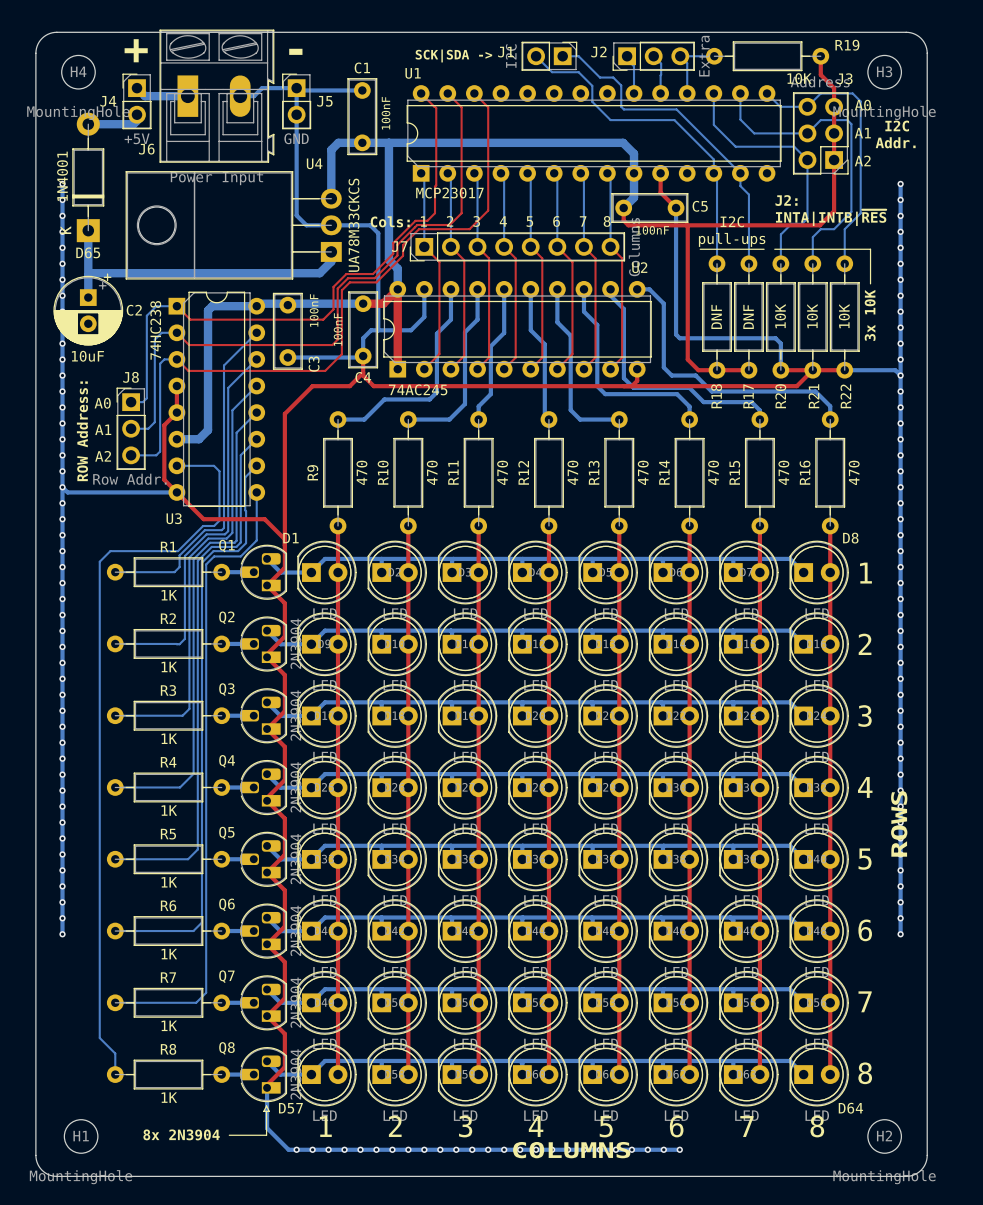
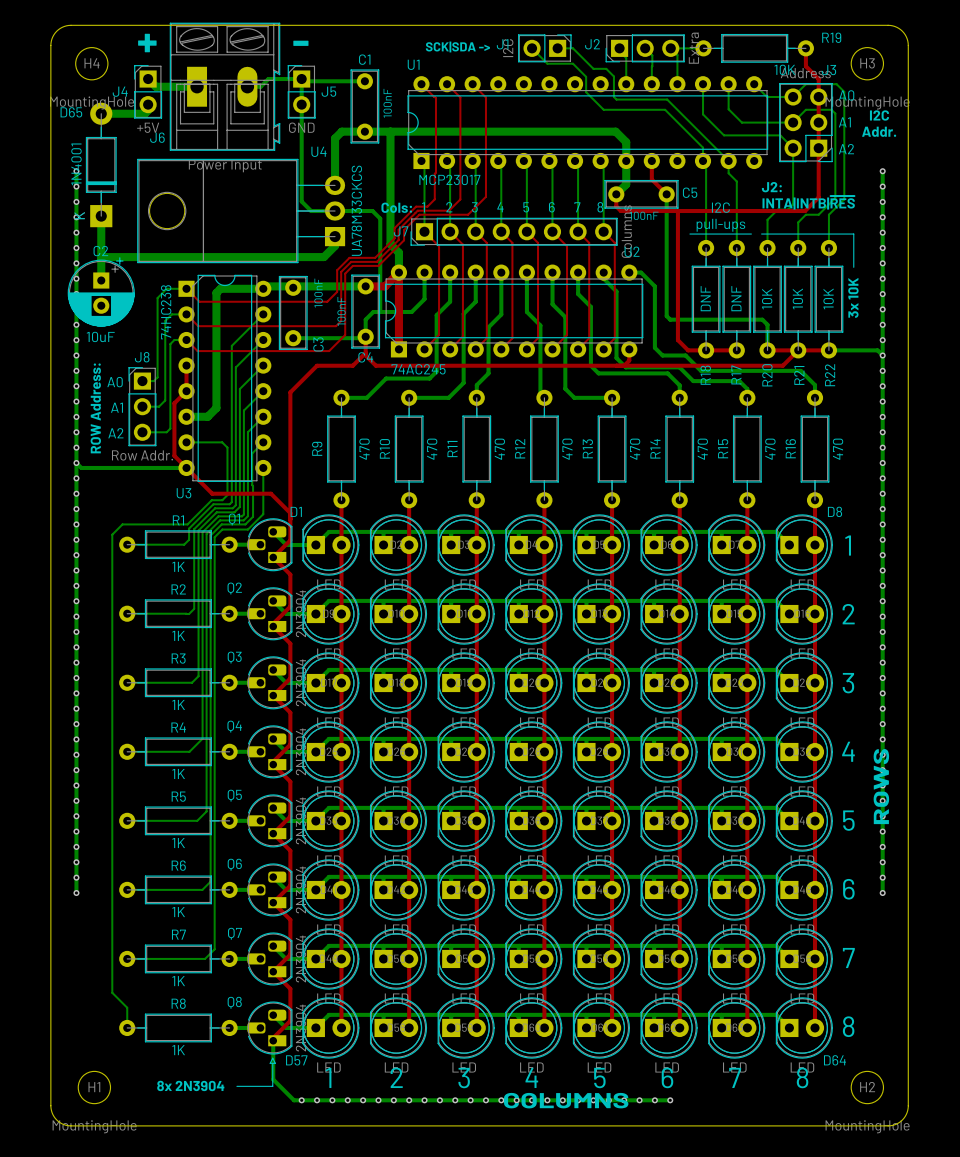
D65 name position: D65 (88, 252) -> D65 (71, 112)
C2 name position: C2 (134, 310) -> C2 (100, 251)

